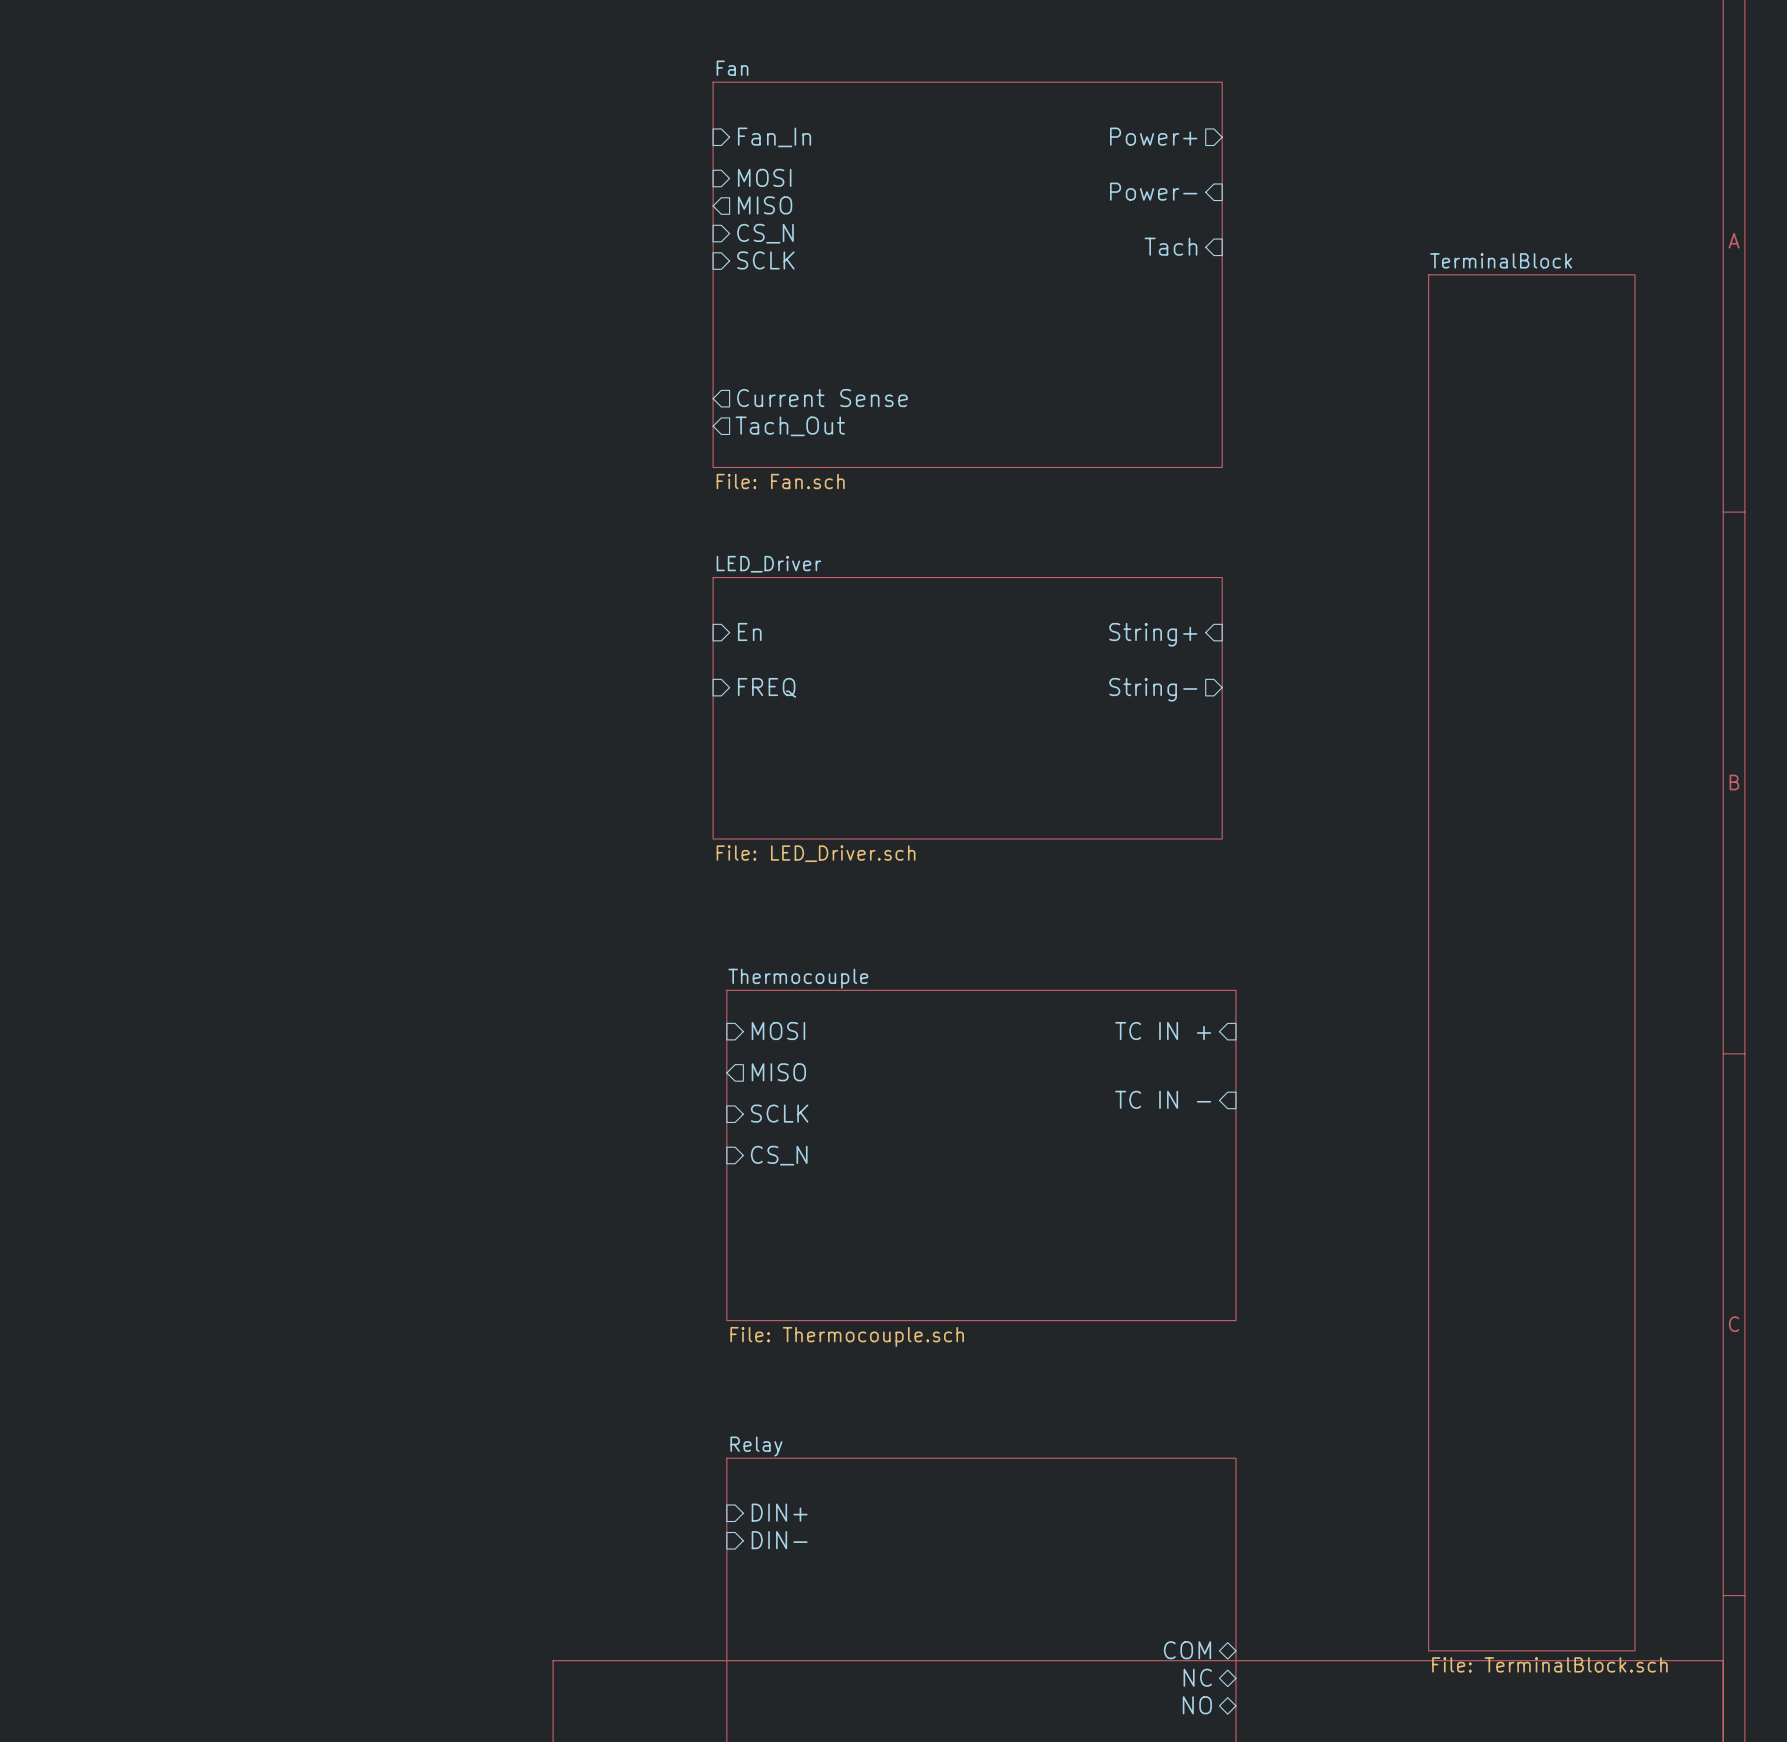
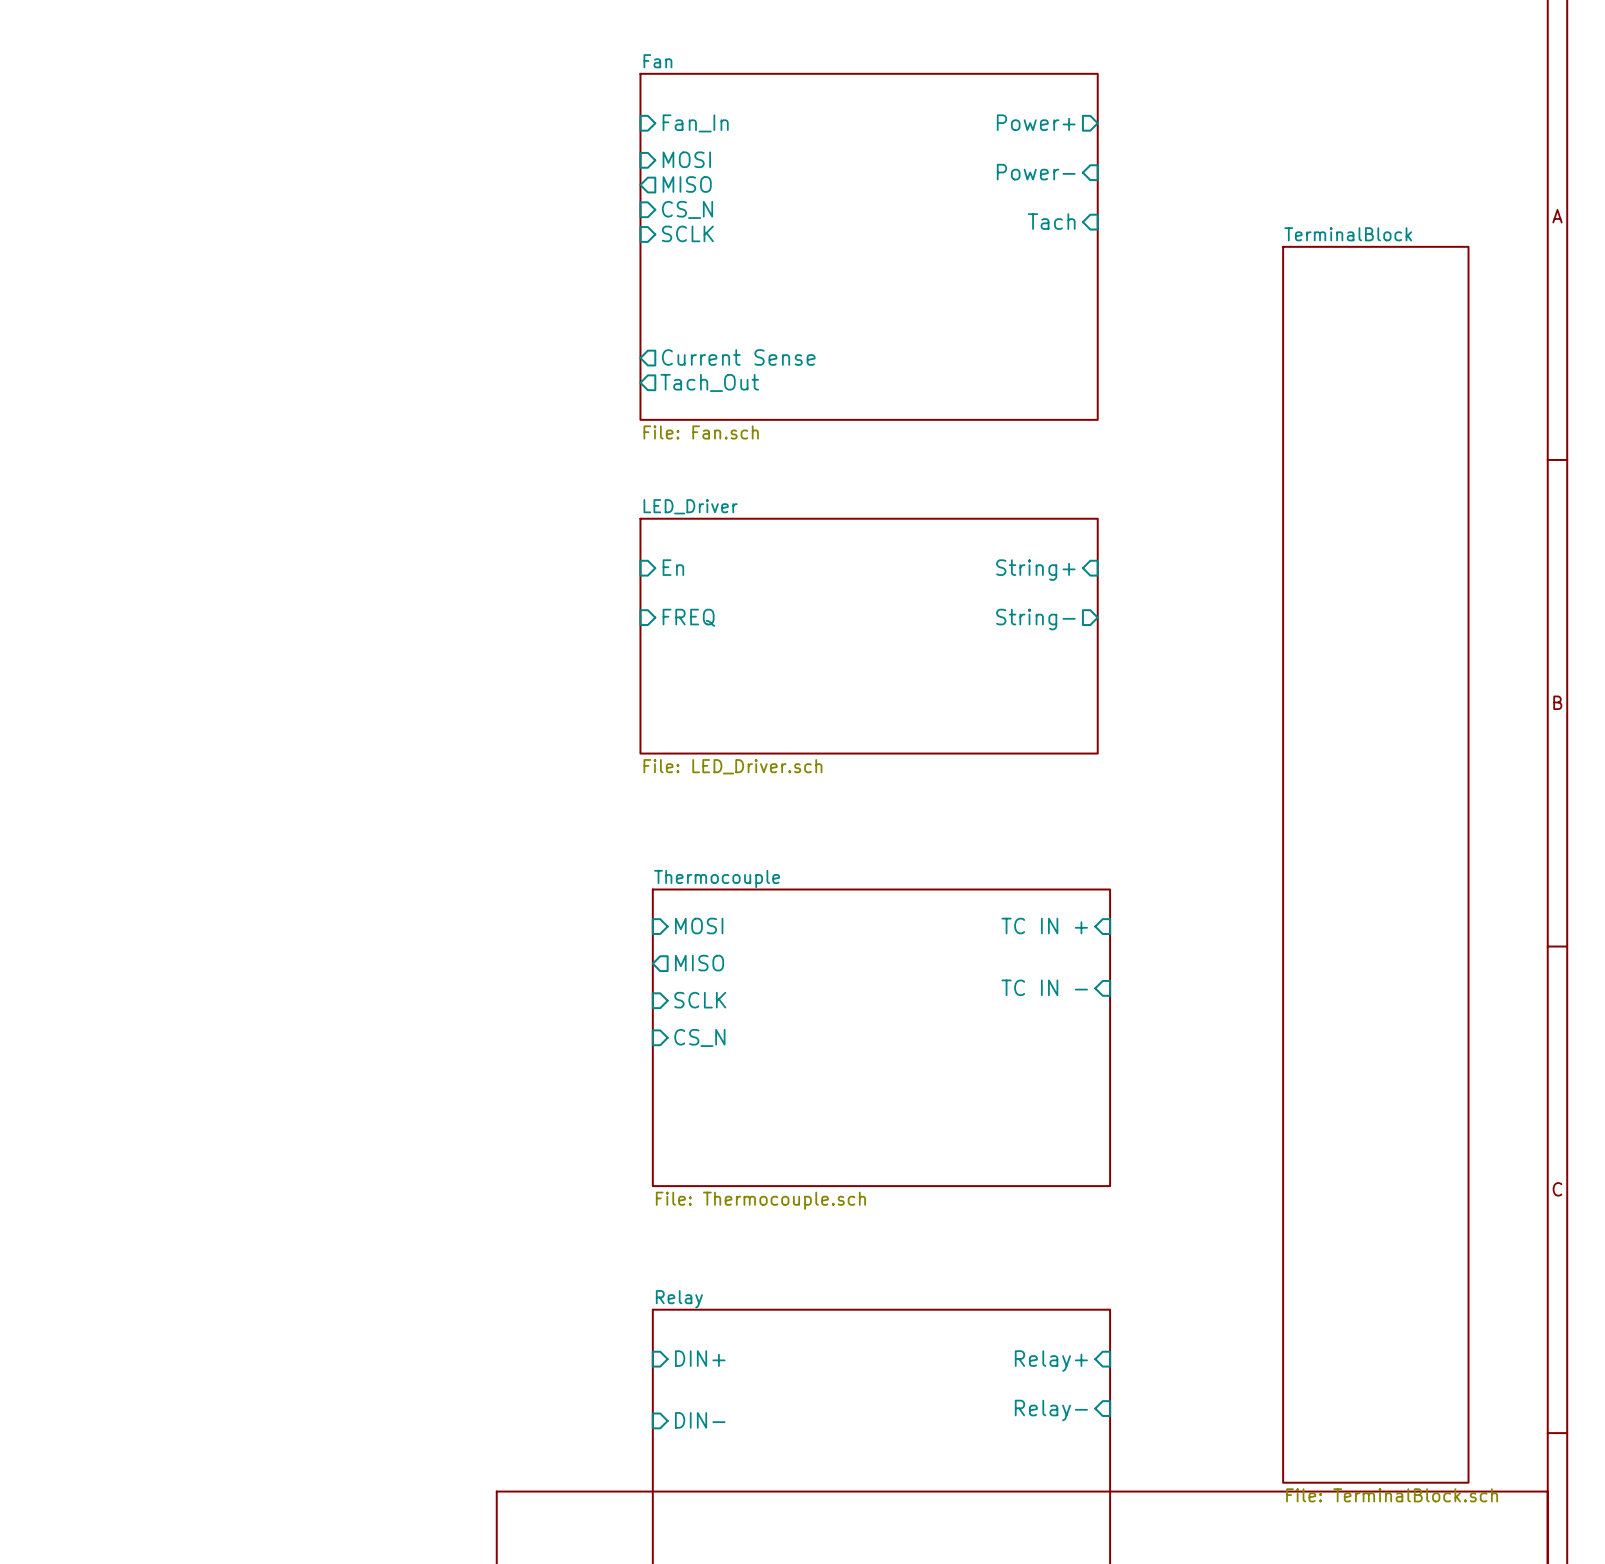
sheet pin: none -> Relay+ (1051, 1361)
sheet pin position: DIN- (779, 1540) -> DIN- (700, 1420)
sheet pin: none -> Relay- (1051, 1410)
sheet pin: COM (1187, 1650) -> none
sheet pin: NC (1197, 1677) -> none
sheet pin: NO (1197, 1705) -> none

